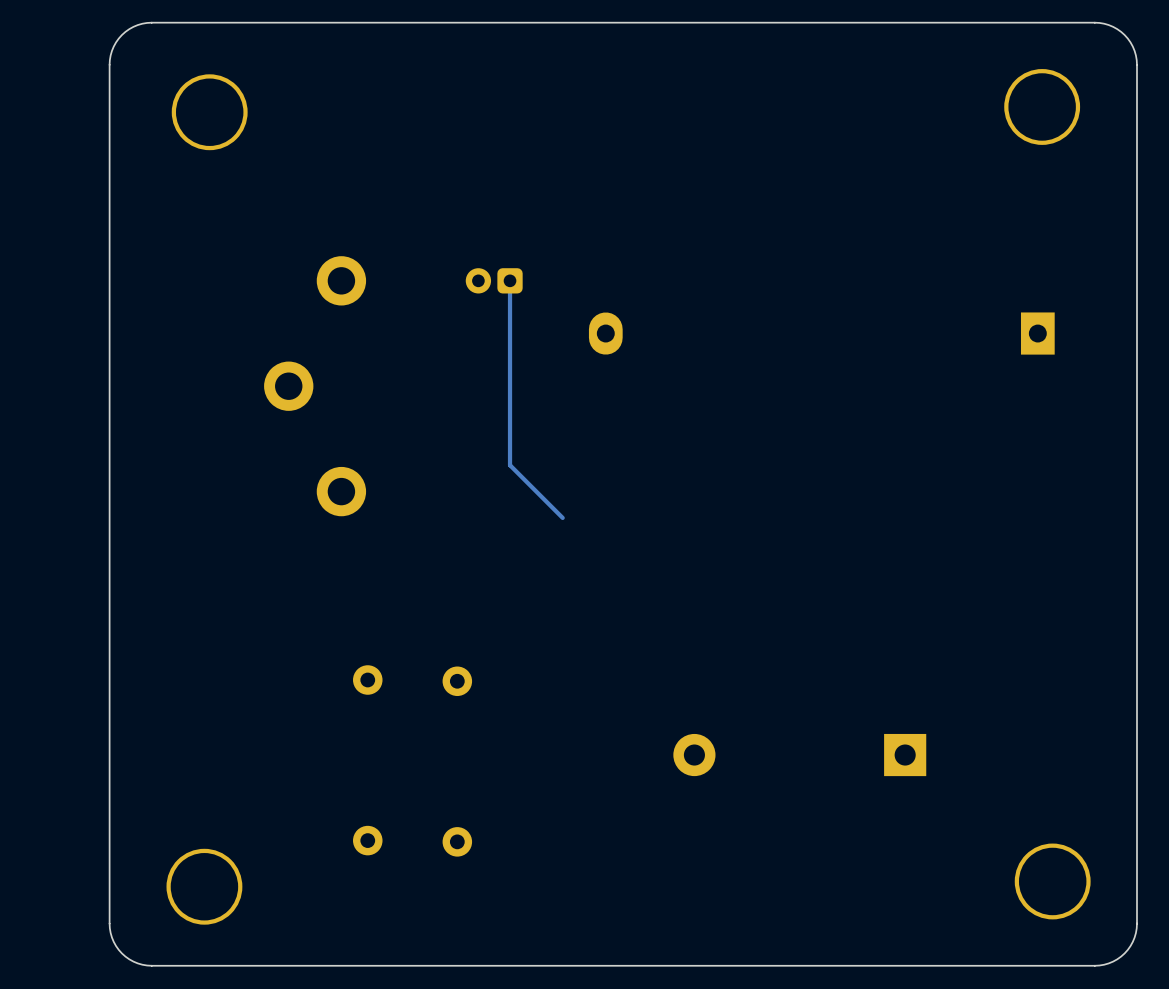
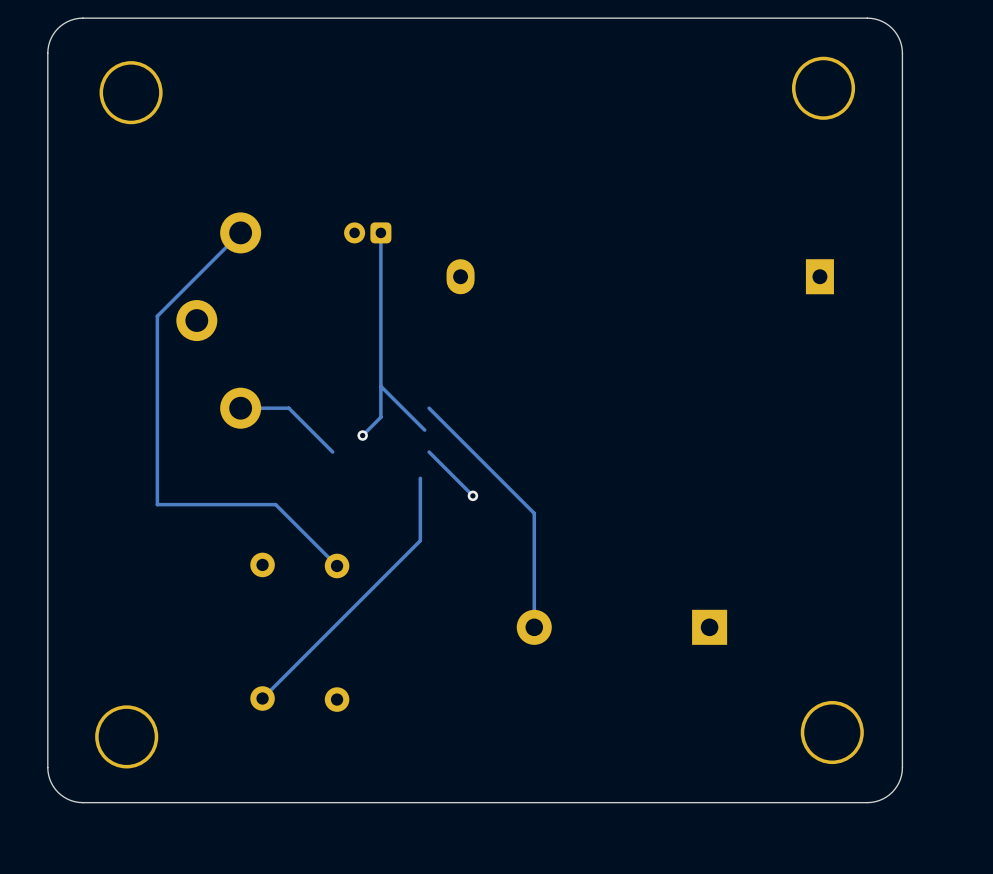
track: none -> (240, 232) (157, 316) (157, 504) (275, 504) (337, 565)
track: none -> (380, 386) (380, 417) (362, 435)
track: none -> (240, 408) (288, 408) (332, 452)
track: none -> (429, 408) (534, 513) (534, 627)
via: none -> (362, 435)
track: none -> (429, 452) (472, 495)
track: none -> (420, 478) (420, 540) (262, 698)
via: none -> (472, 495)

